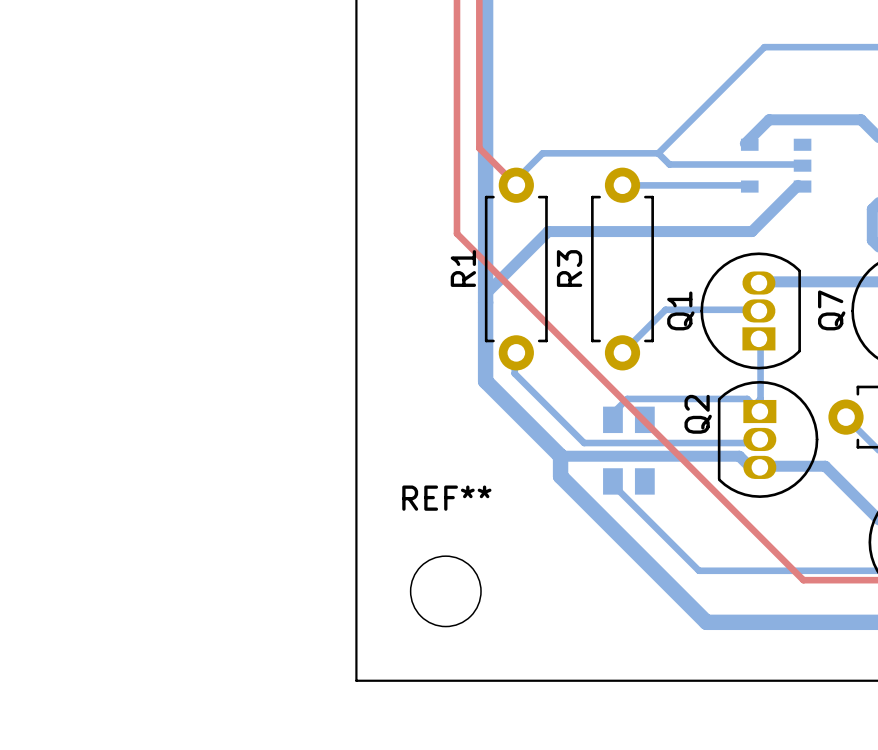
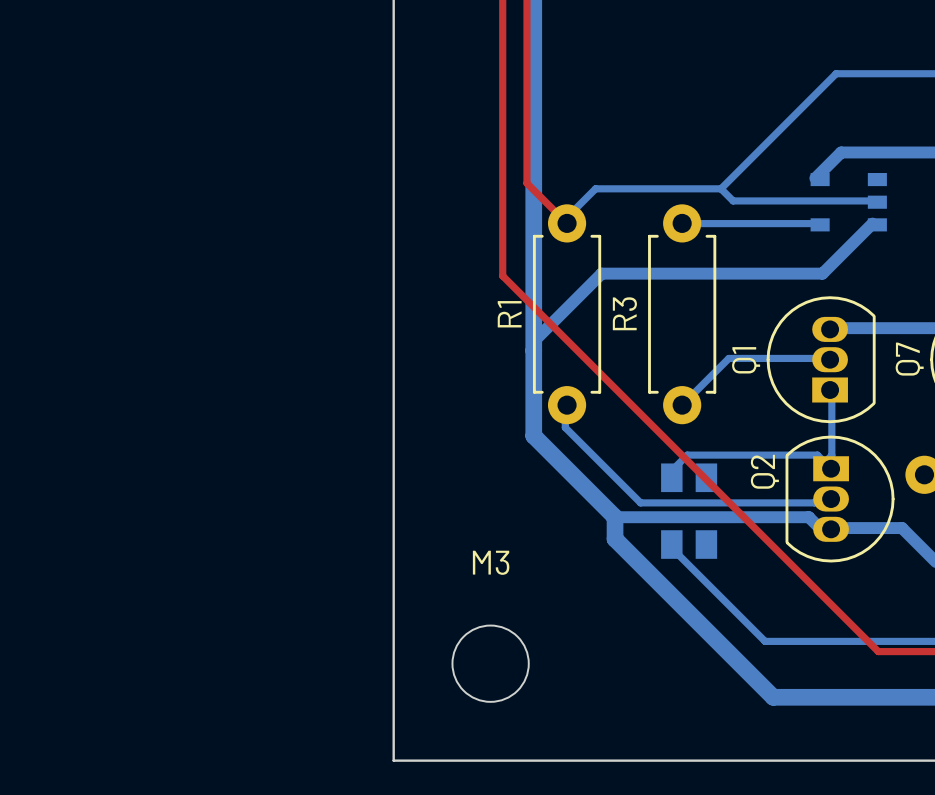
REF** name: REF** (446, 498) -> M3 (491, 562)

